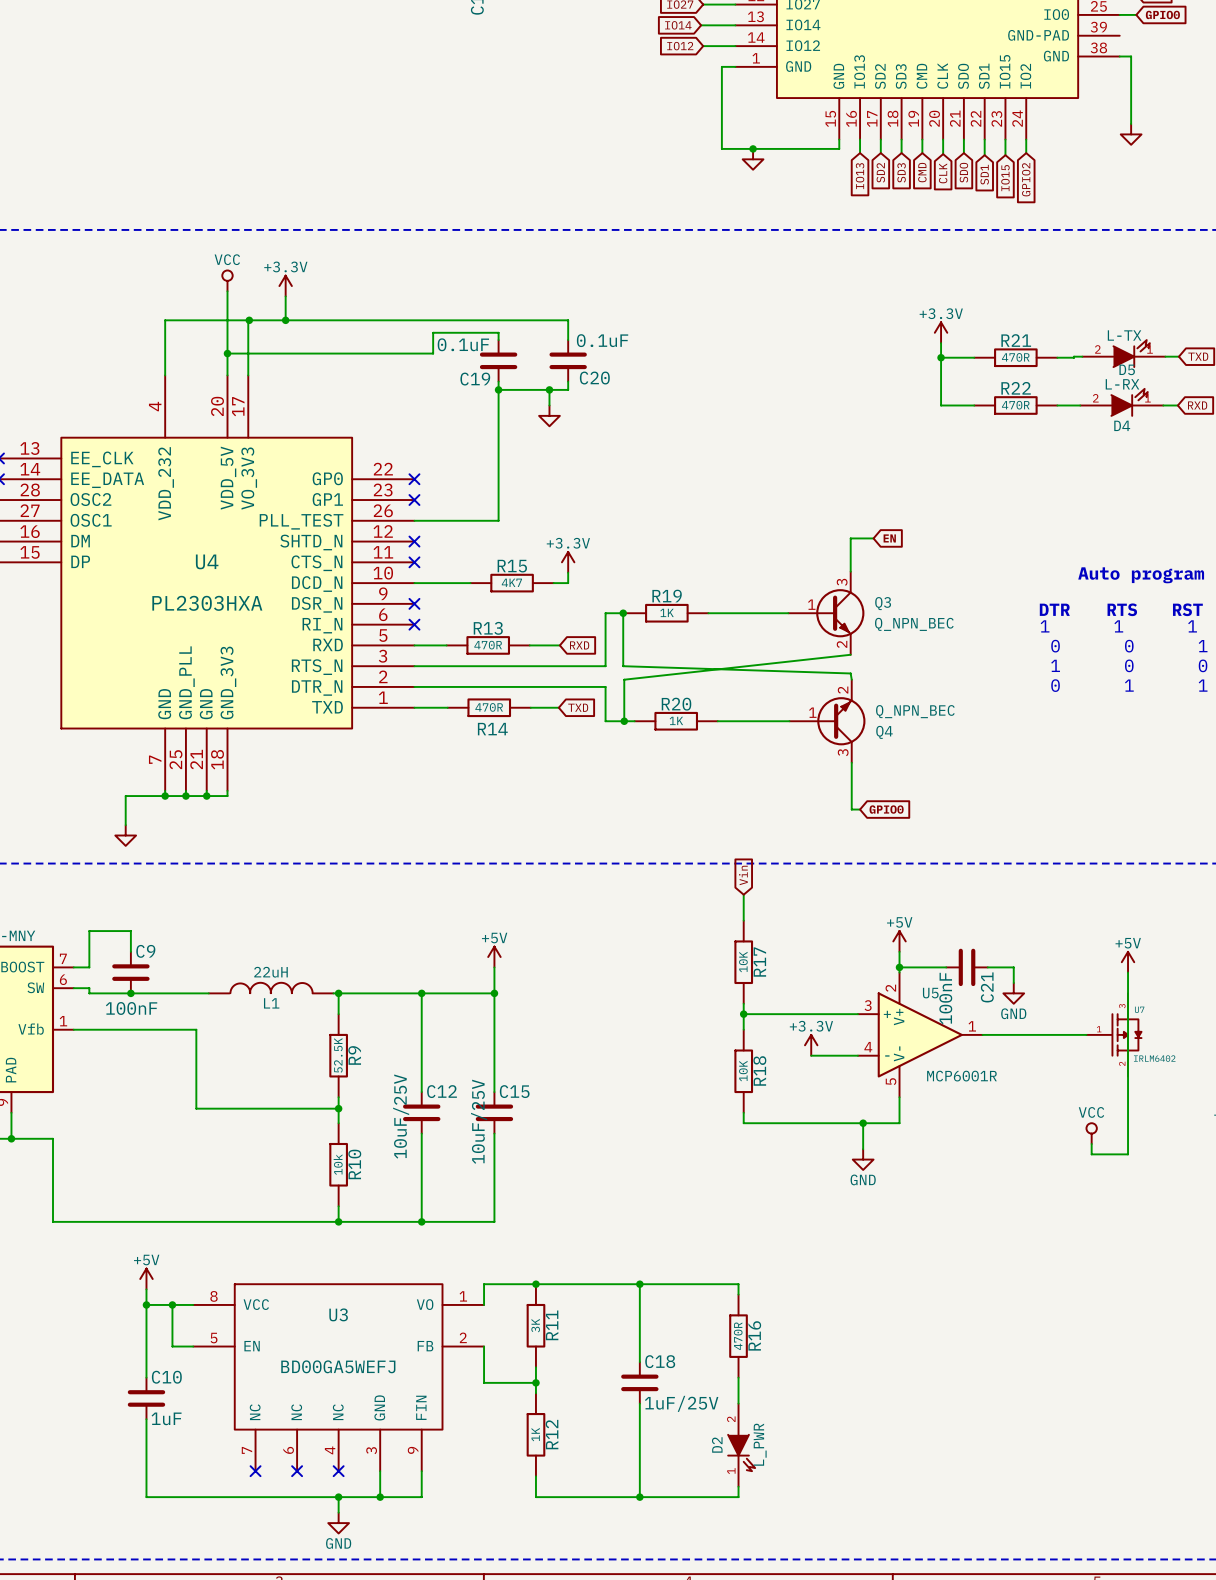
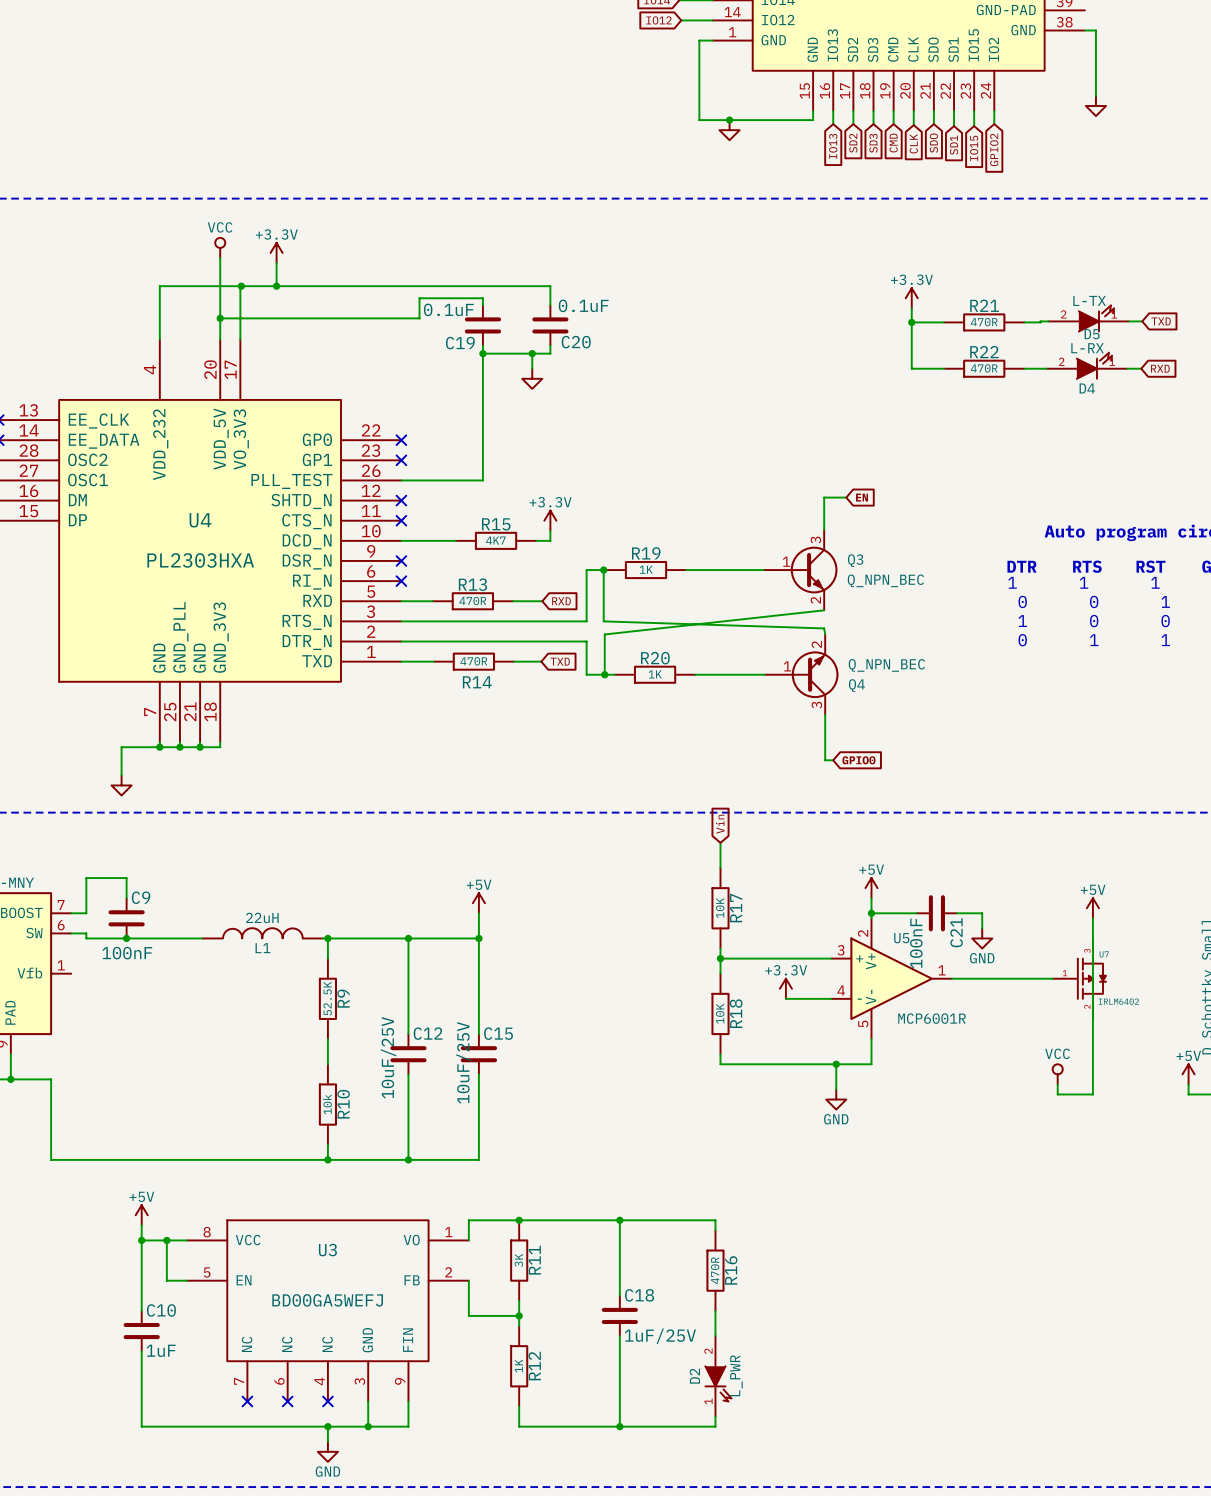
wire: (73, 1029) (196, 1029) (196, 1108) (338, 1108) -> none
junction: (338, 1108) -> none

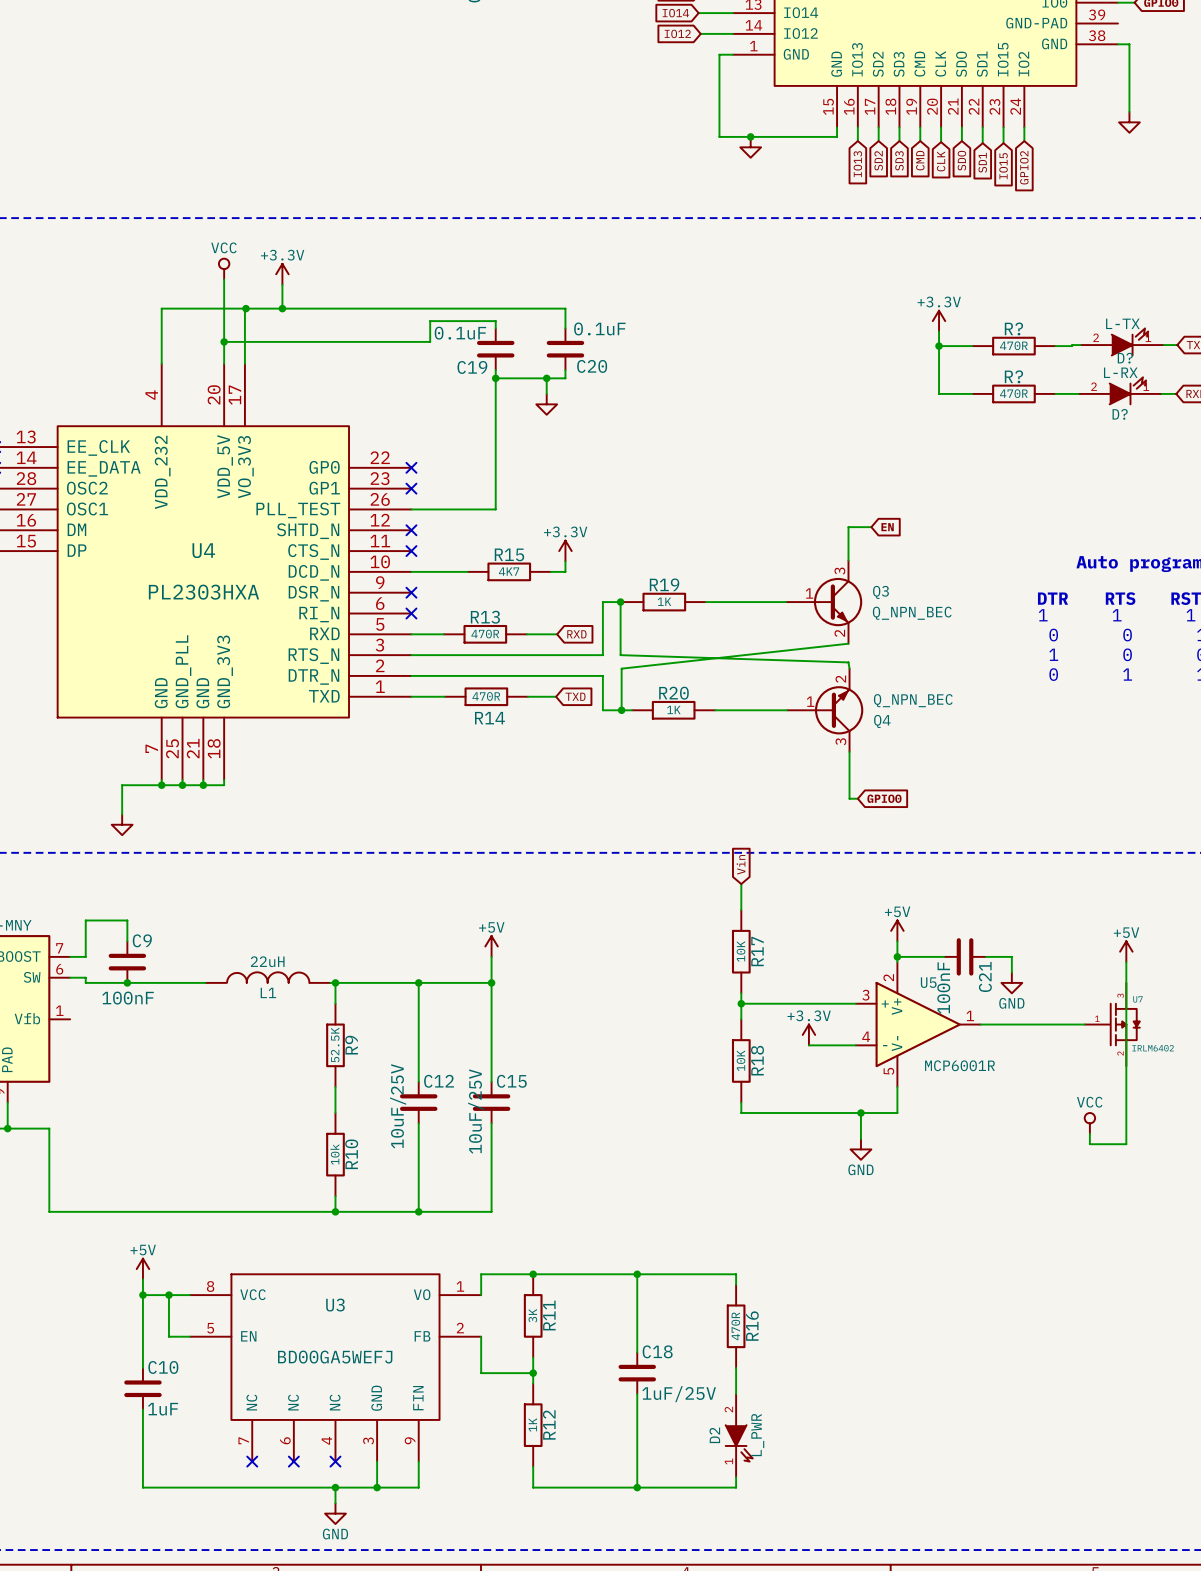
R21 name: R21 (984, 305) -> R? (1013, 328)
D5 name: D5 (1092, 334) -> D? (1125, 358)
R22 name: R22 (984, 352) -> R? (1013, 376)
D4 name: D4 (1087, 388) -> D? (1120, 414)

